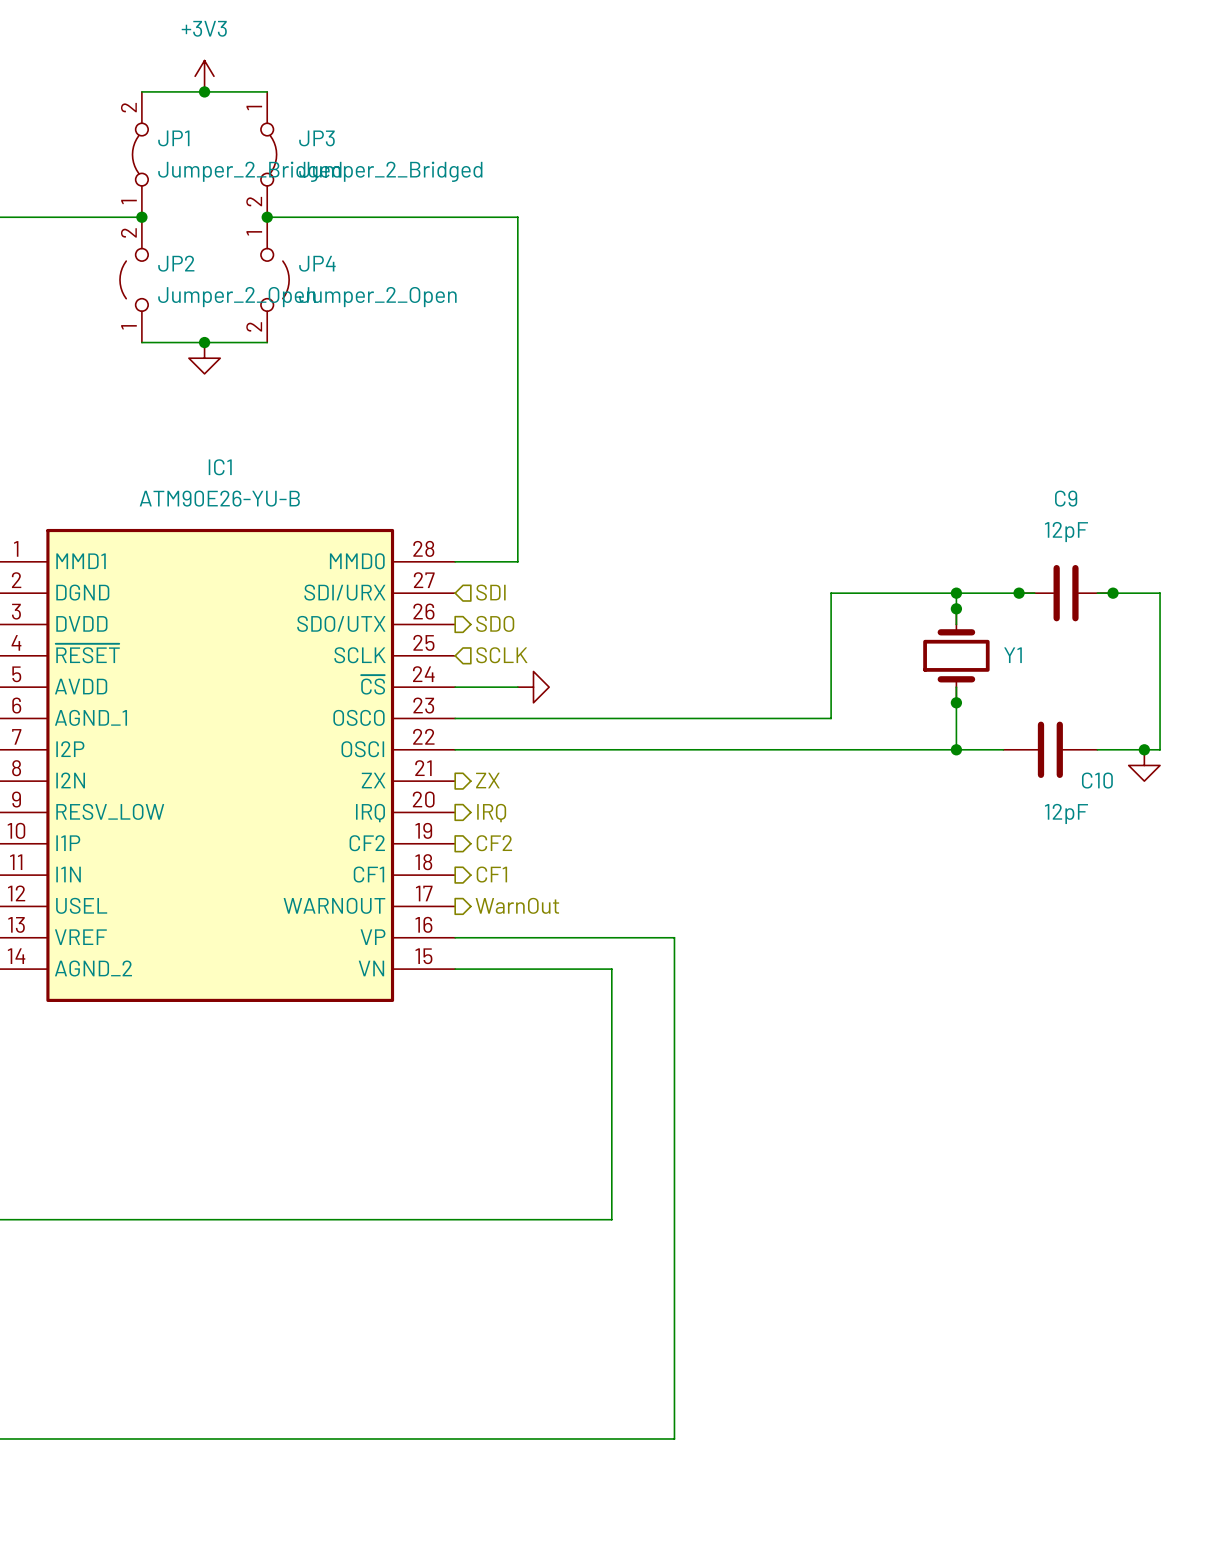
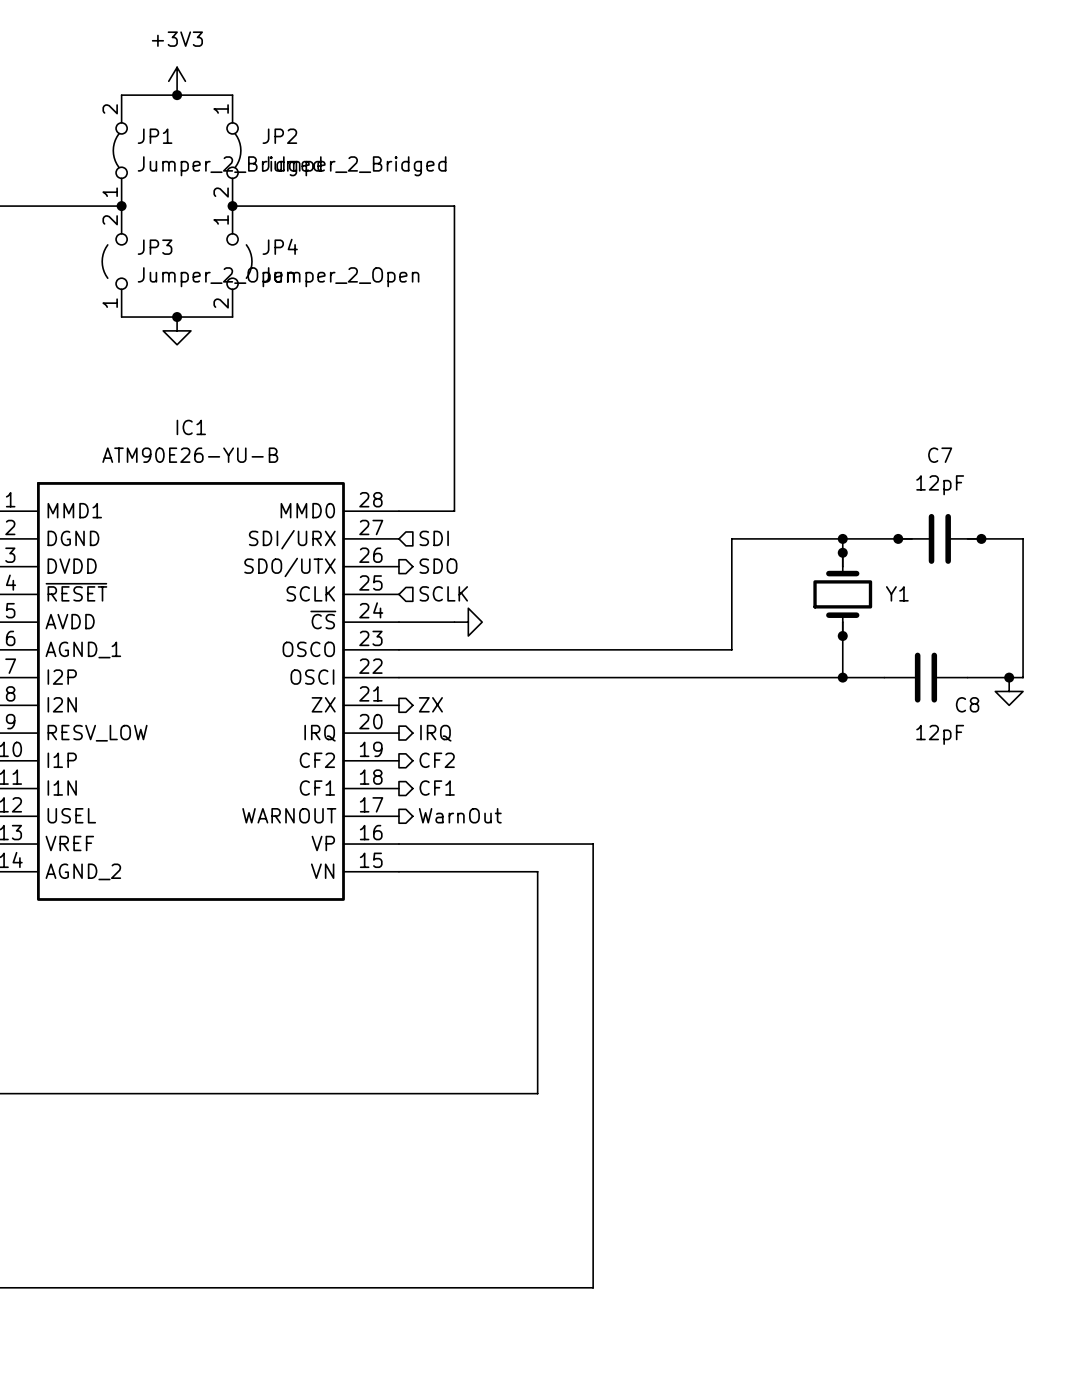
JP3 name: JP3 (316, 138) -> JP2 (279, 136)
JP2 name: JP2 (176, 263) -> JP3 (155, 247)
C9 name: C9 (1066, 498) -> C7 (940, 455)
C10 name: C10 (1097, 780) -> C8 (967, 704)

